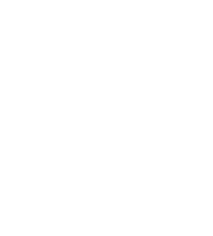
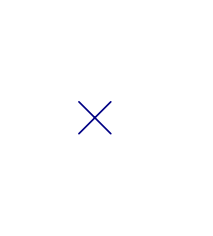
no-connect mark: none -> (94, 117)

